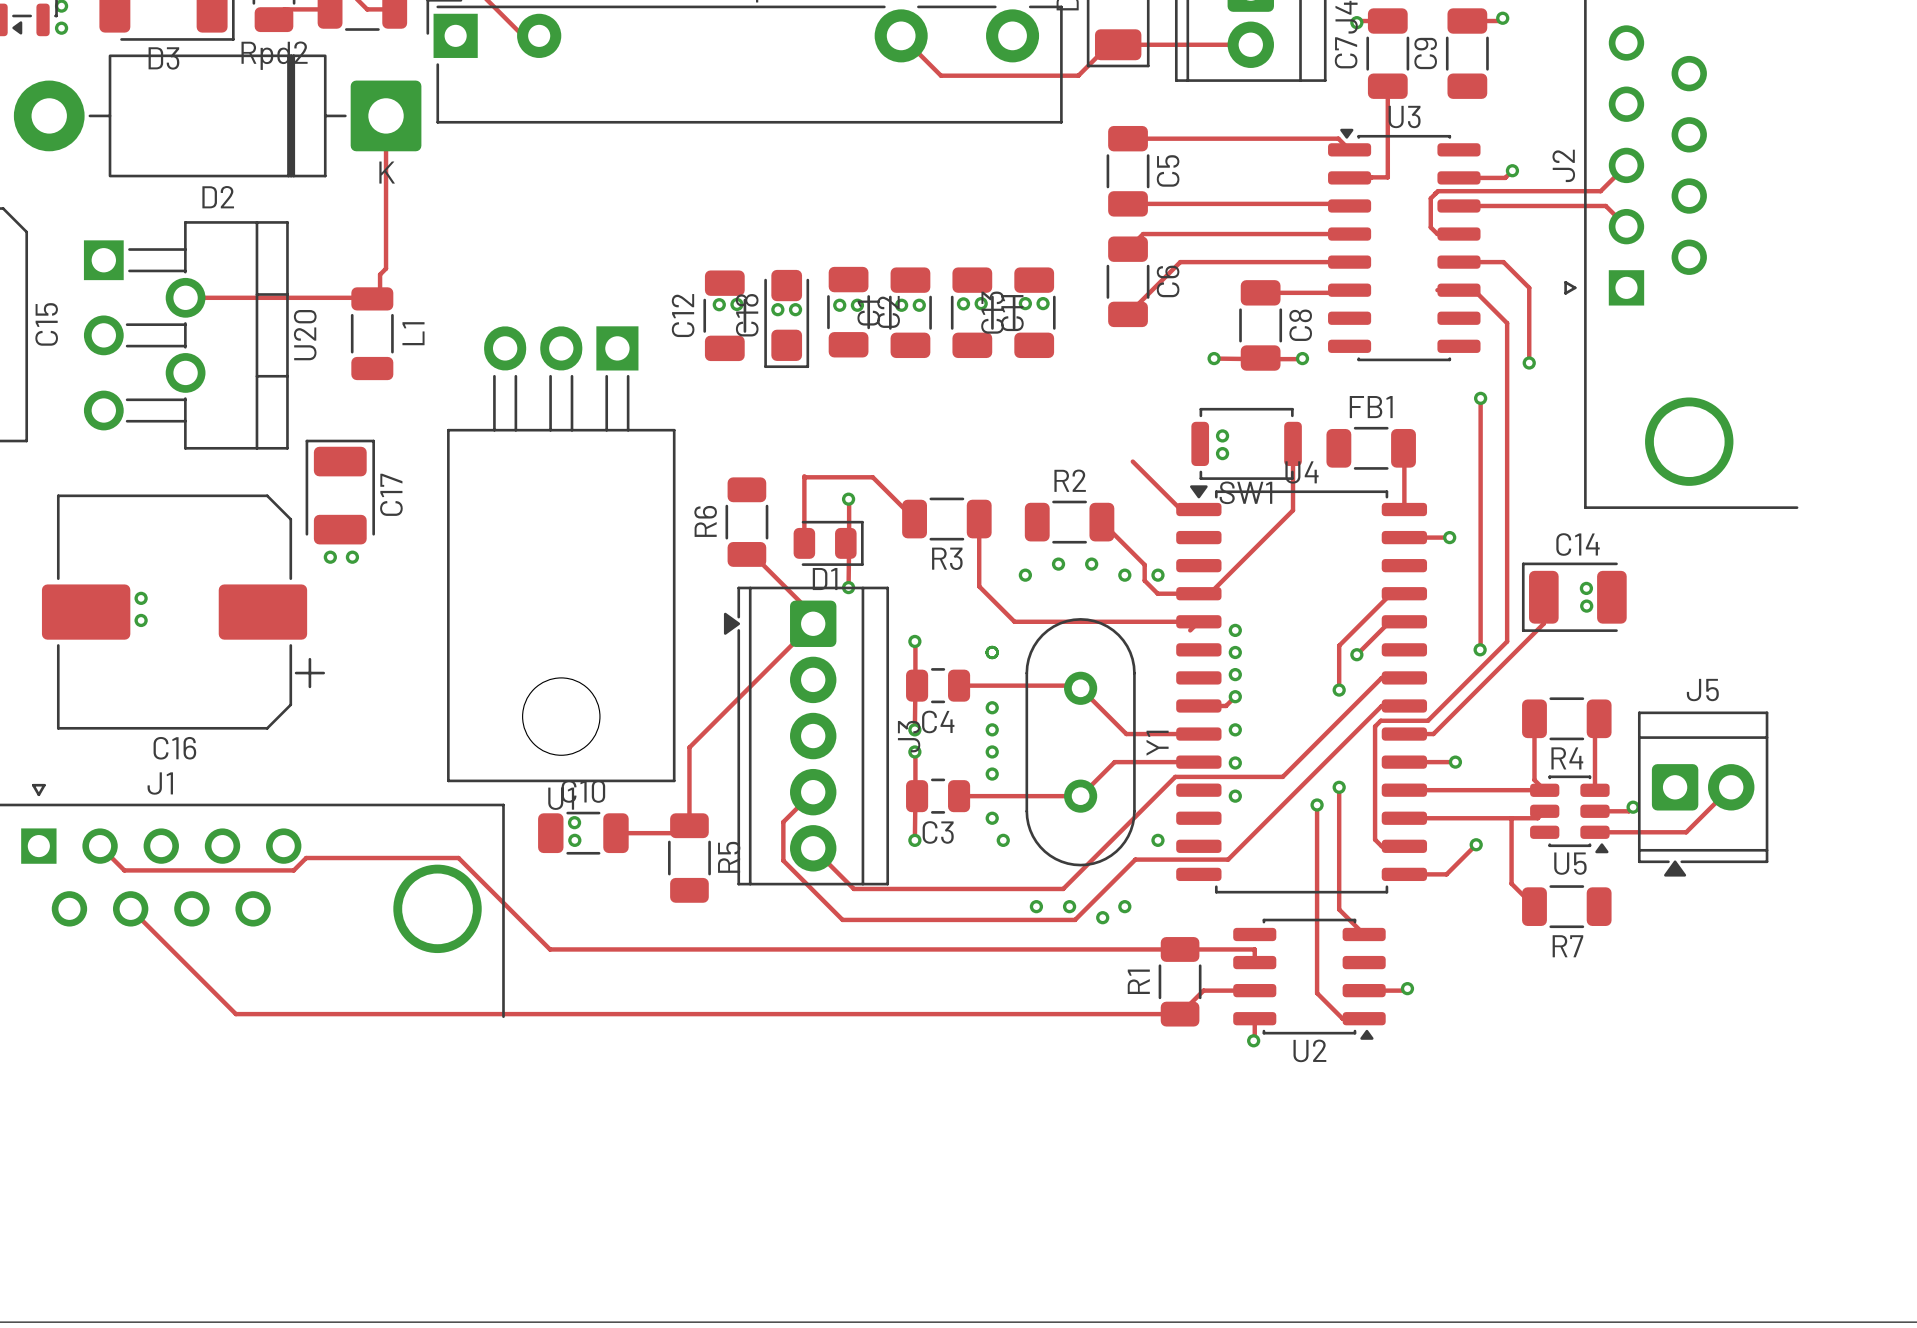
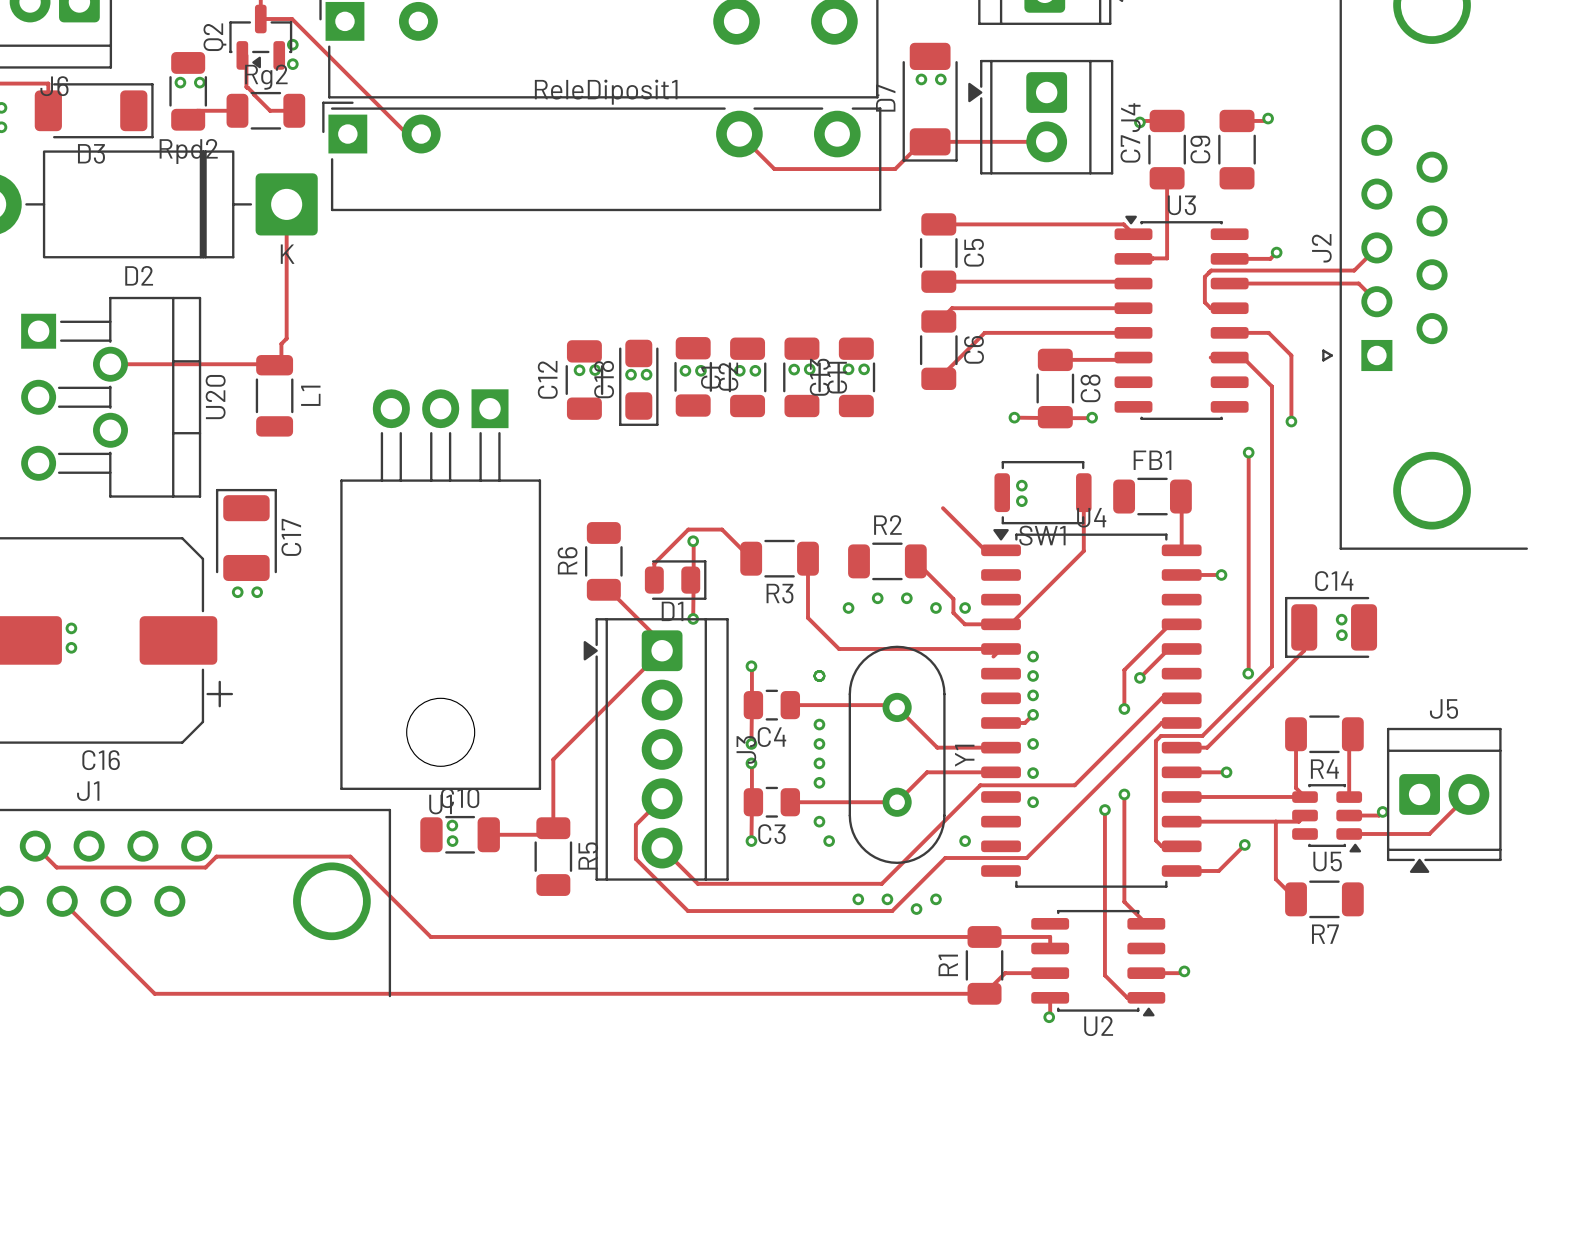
track: (804, 476) (804, 524) -> none
track: (804, 477) (872, 477) (881, 485) -> (654, 563) (688, 529) (722, 529)

